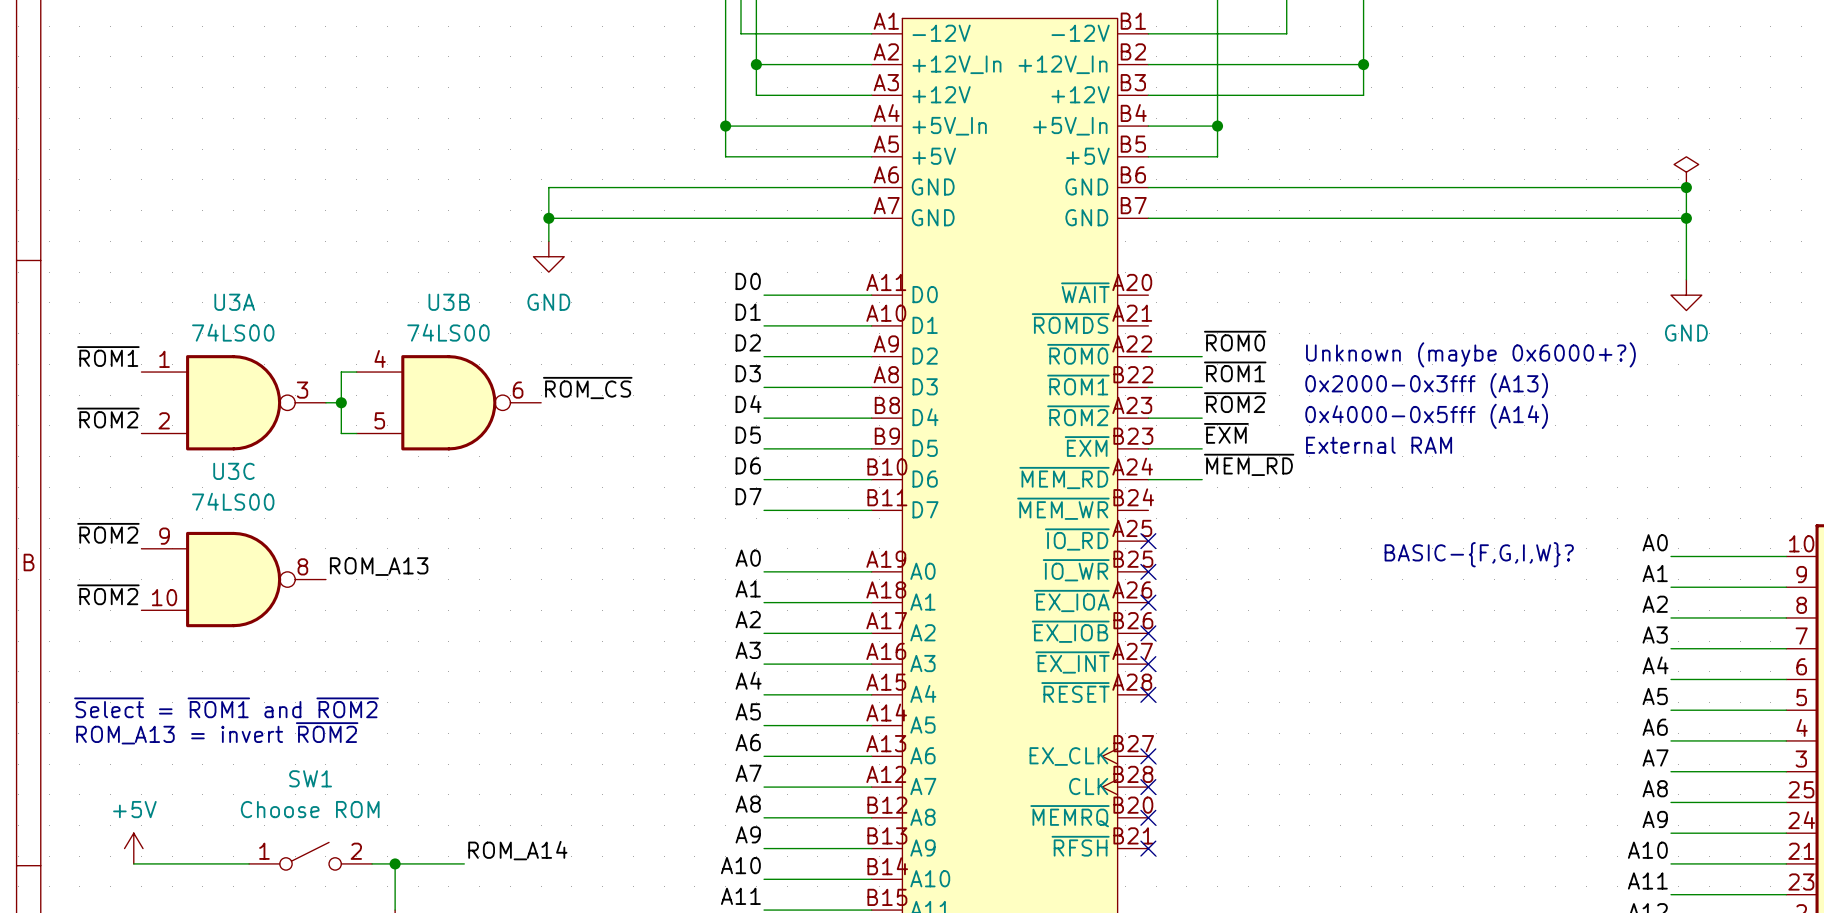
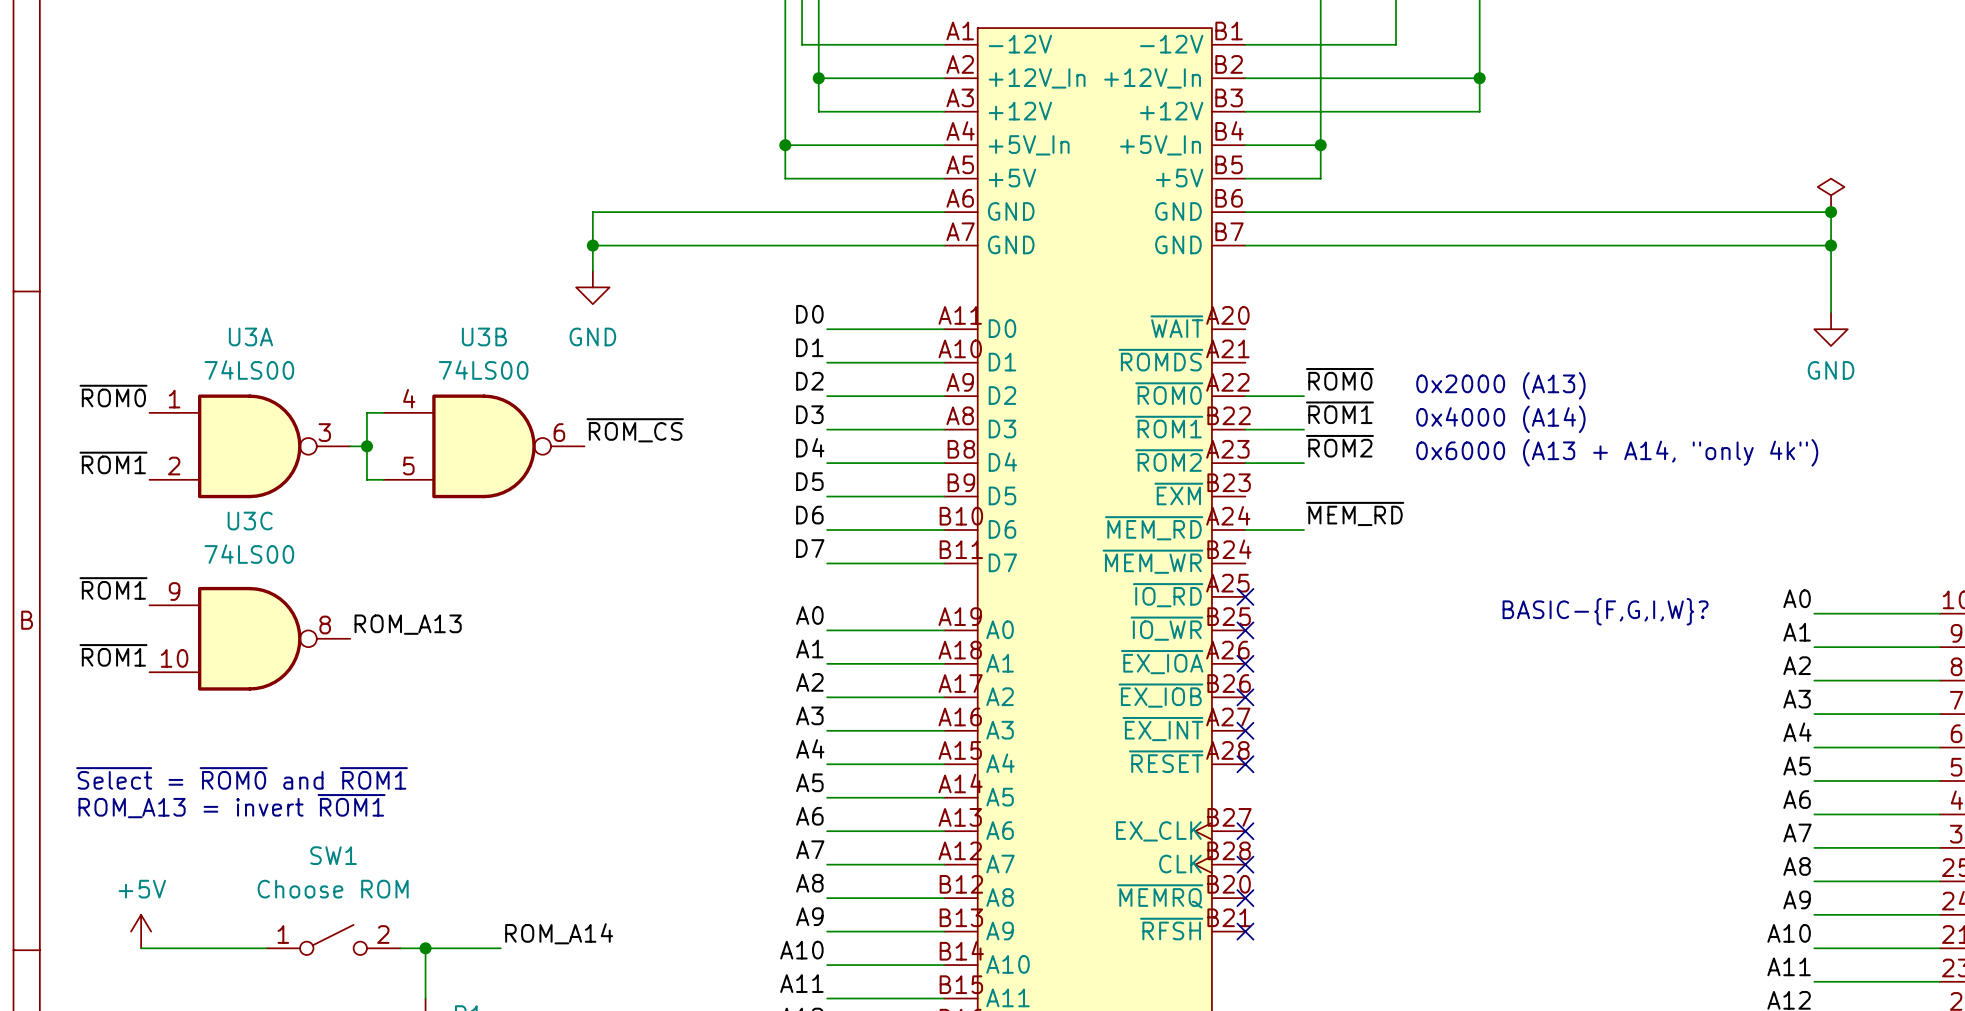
text: Unknown (maybe 0x6000+?) (1470, 354) -> 0x2000 (A13) (1500, 385)
label: ~{ROM1} (108, 356) -> ~{ROM0} (113, 396)
text: 0x2000-0x3fff (A13) (1426, 385) -> 0x4000 (A14) (1500, 419)
text: 0x4000-0x5fff (A14) (1426, 416) -> 0x6000 (A13 + A14, "only 4k") (1617, 452)
label: ~{ROM2} (108, 418) -> ~{ROM1} (113, 462)
label: ~{EXM} (1226, 433) -> none
text: External RAM (1379, 445) -> none
wire: (1148, 448) (1202, 448) -> none
label: ~{ROM2} (108, 533) -> ~{ROM1} (113, 588)
label: ~{ROM2} (108, 594) -> ~{ROM1} (113, 655)
text: ~{Select} = ~{ROM1} and ~{ROM2} (226, 707) -> ~{Select} = ~{ROM0} and ~{ROM1} (242, 778)
text: ROM_A13 = invert ~{ROM2} (217, 733) -> ROM_A13 = invert ~{ROM1} (232, 806)

